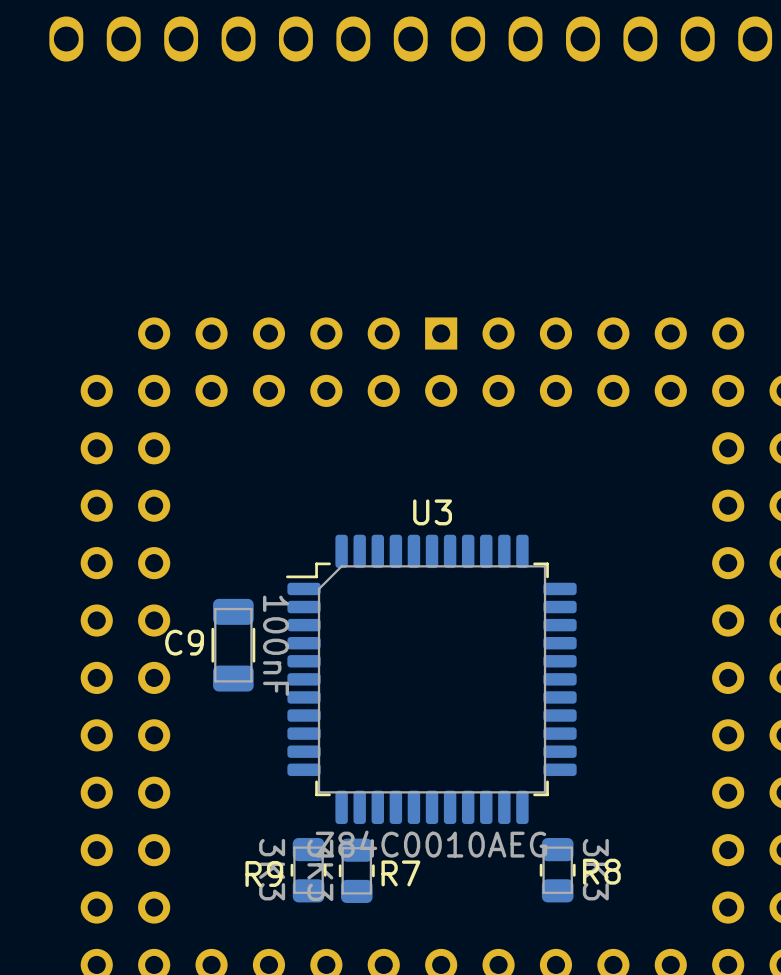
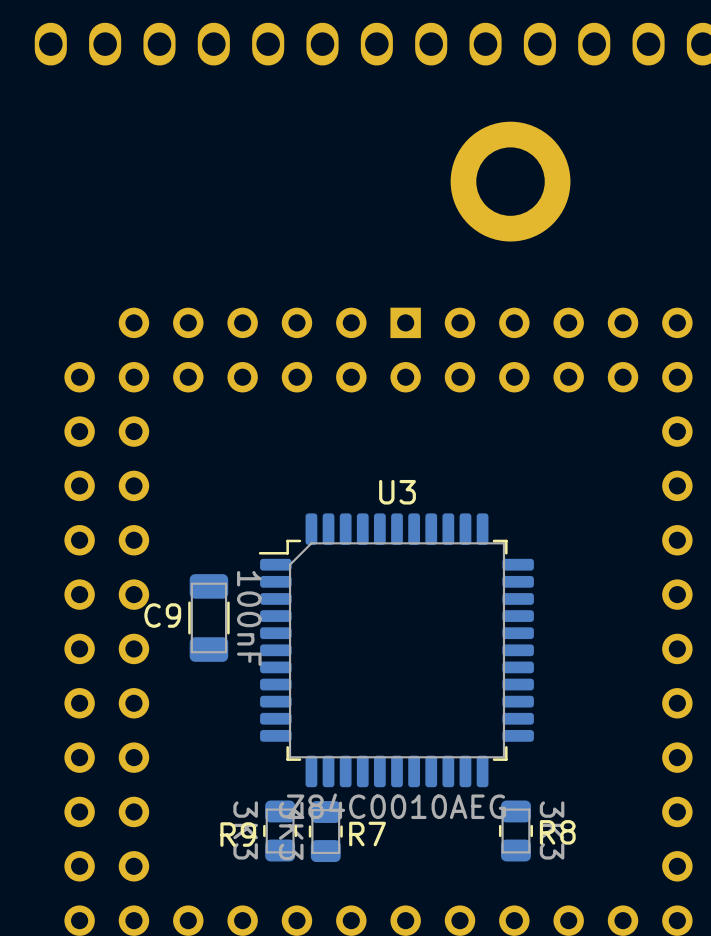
part: none -> (510, 181)

